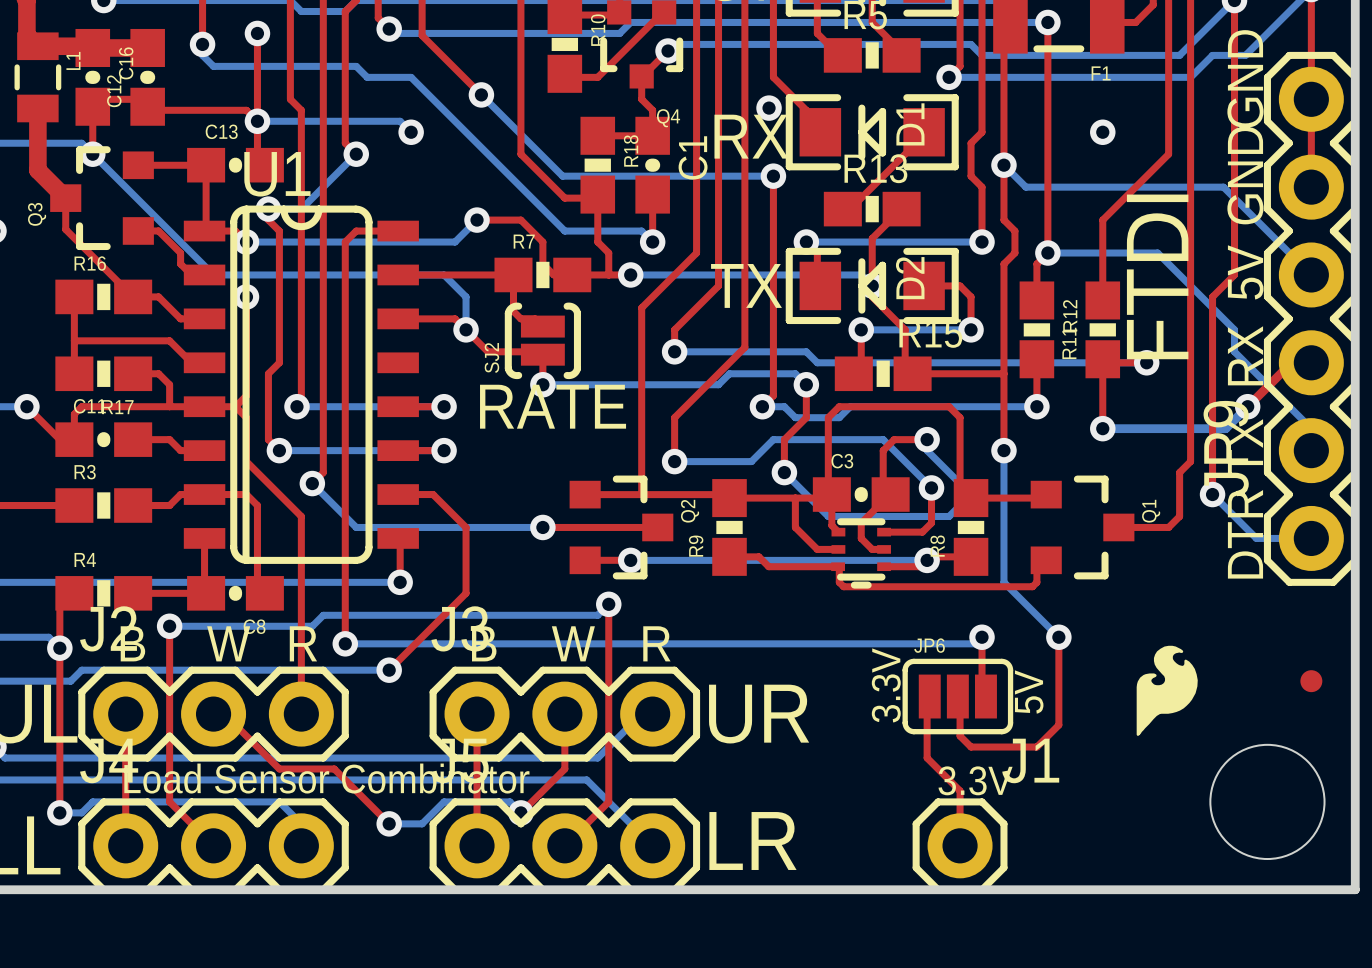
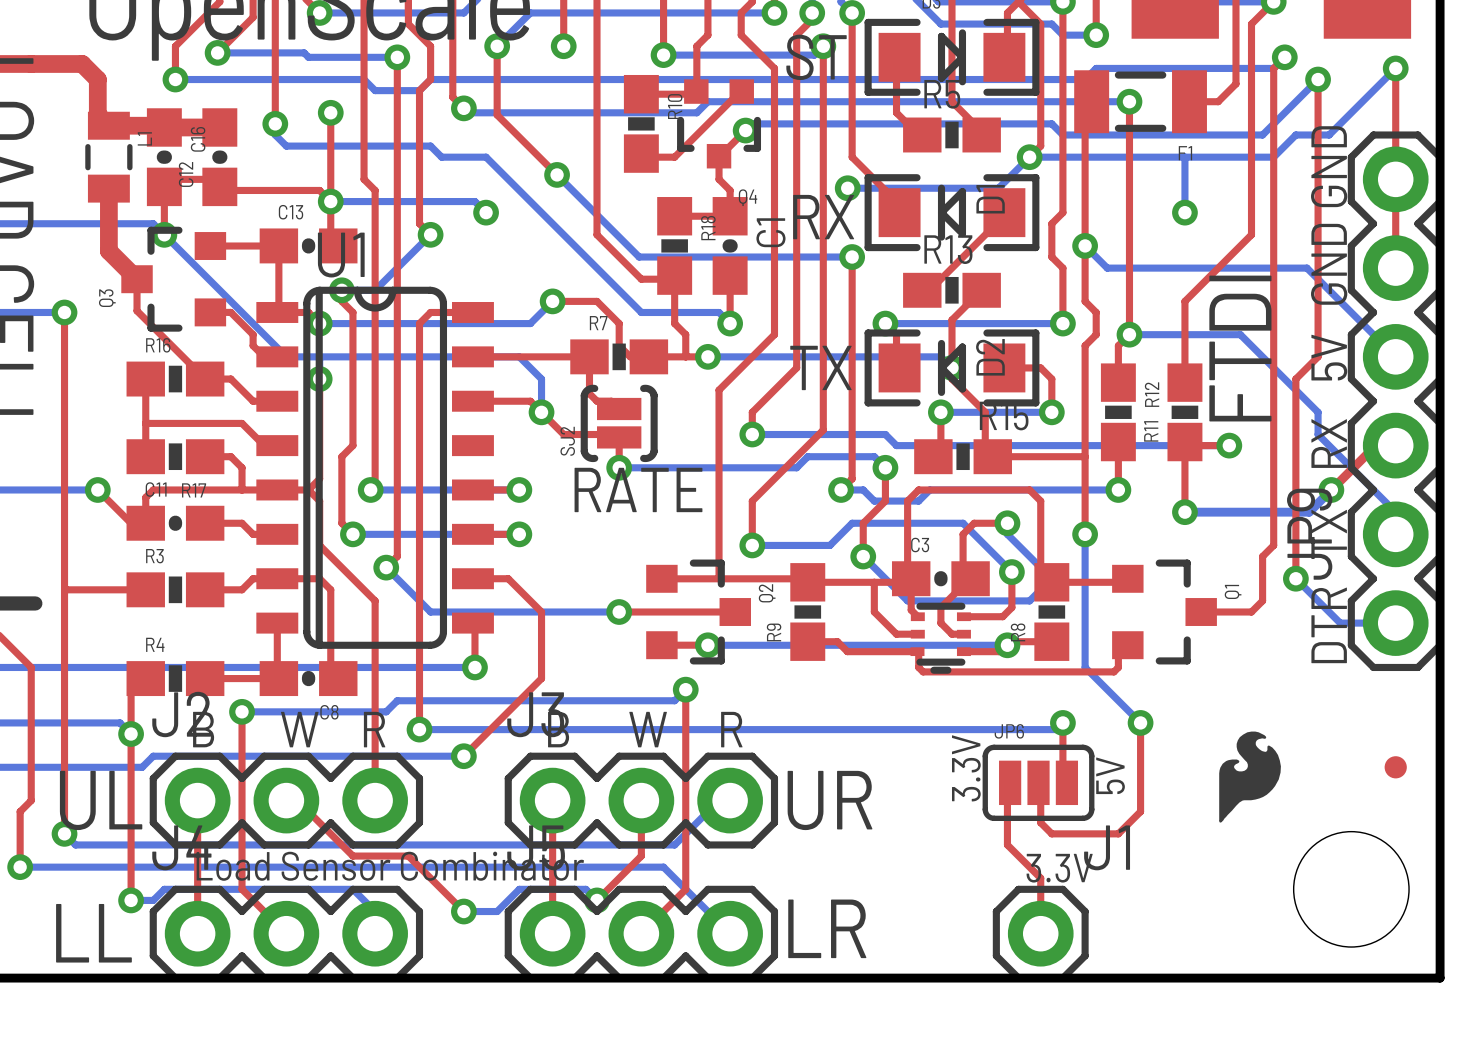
bottom track: none -> (1029, 157) (998, 188) (847, 188)
bottom track: none -> (1184, 157) (1184, 212)

